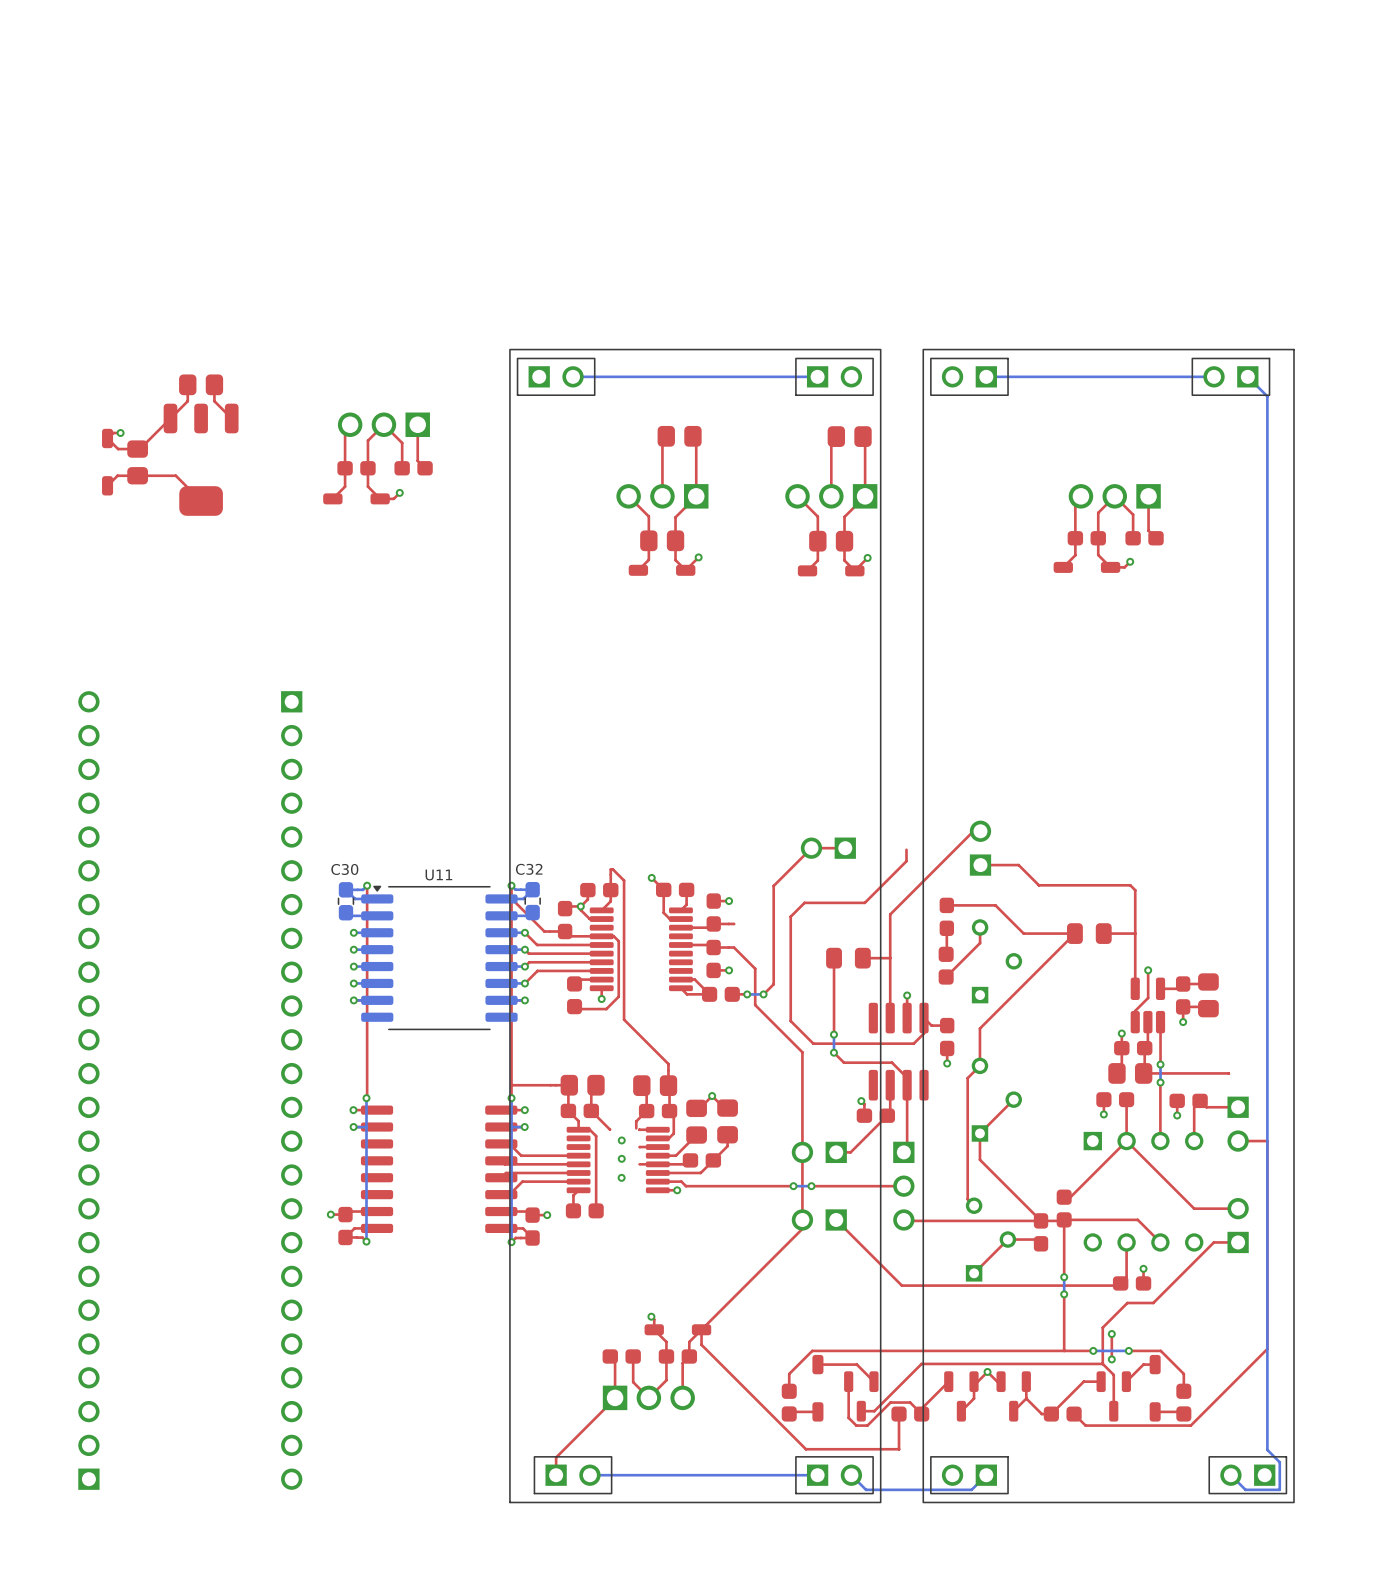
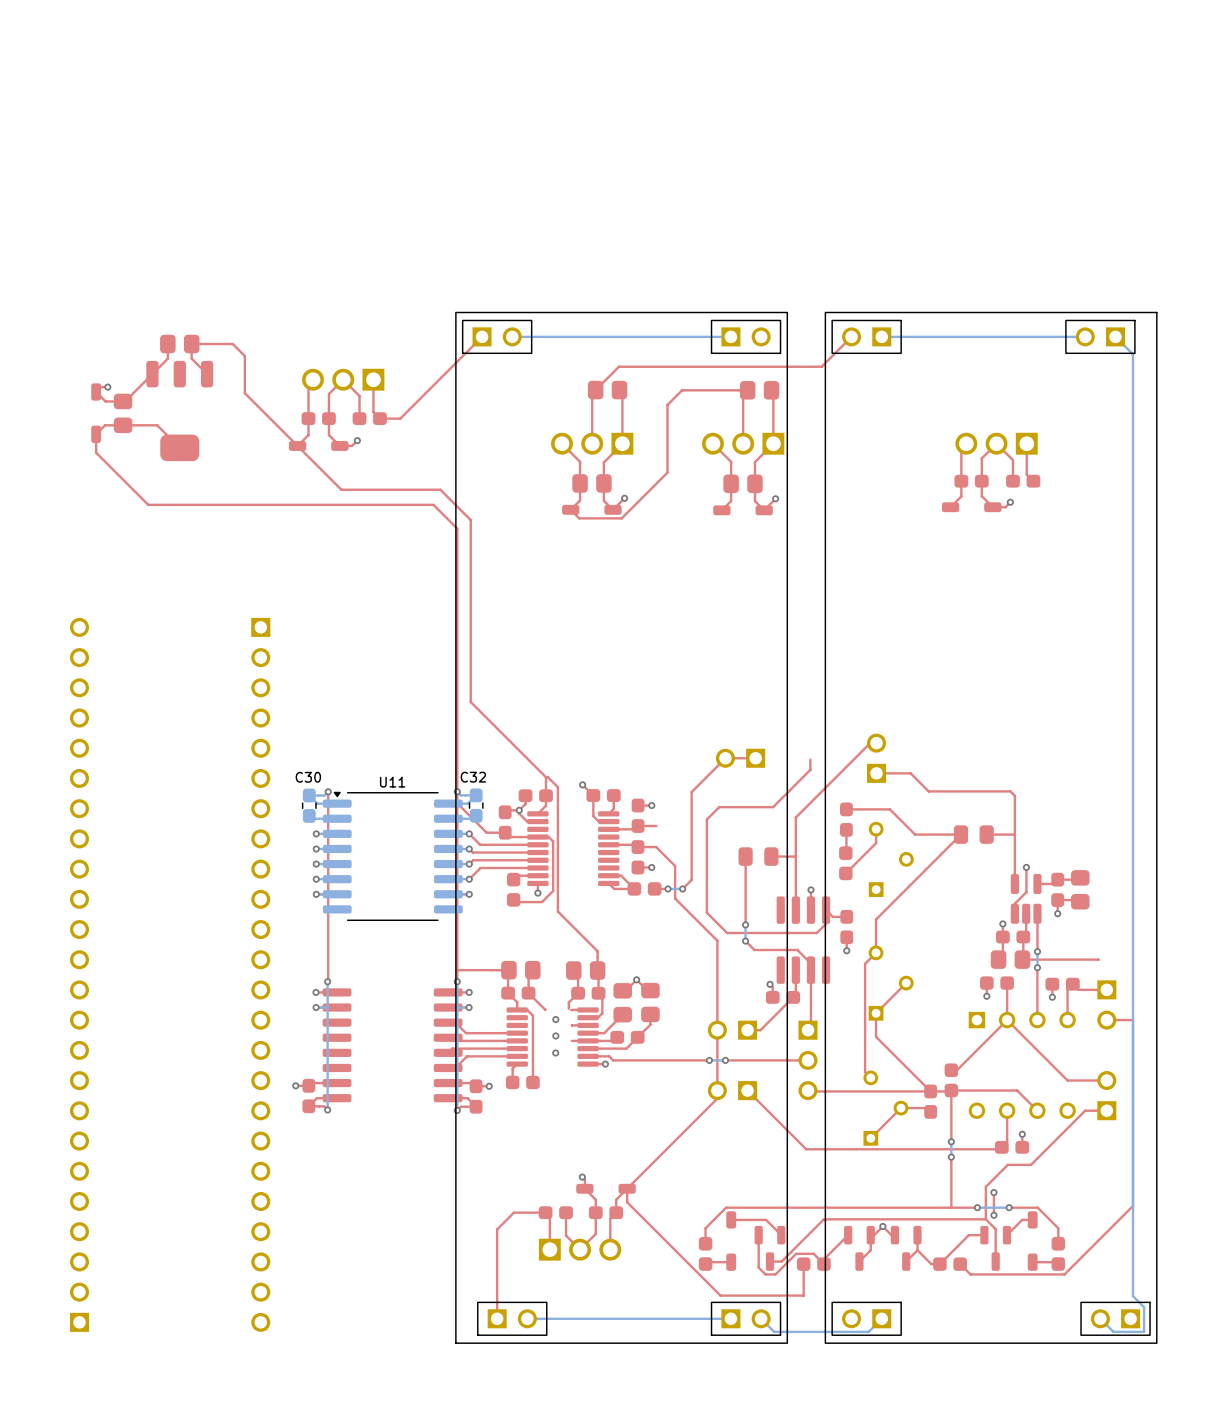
top track: none -> (482, 336) (400, 418) (379, 418)
top track: none -> (851, 336) (821, 366) (618, 366) (595, 390)
top track: none -> (191, 344) (232, 344) (244, 356) (244, 393) (341, 489) (440, 489) (470, 520) (470, 702) (545, 777)
top track: none -> (747, 390) (682, 390) (667, 404) (667, 472) (621, 518) (579, 518) (570, 509)
top track: none -> (96, 434) (96, 452) (148, 504) (433, 504) (457, 528) (457, 791)
top track: (615, 1398) (556, 1457) -> (545, 1212) (513, 1212) (497, 1229) (497, 1302)

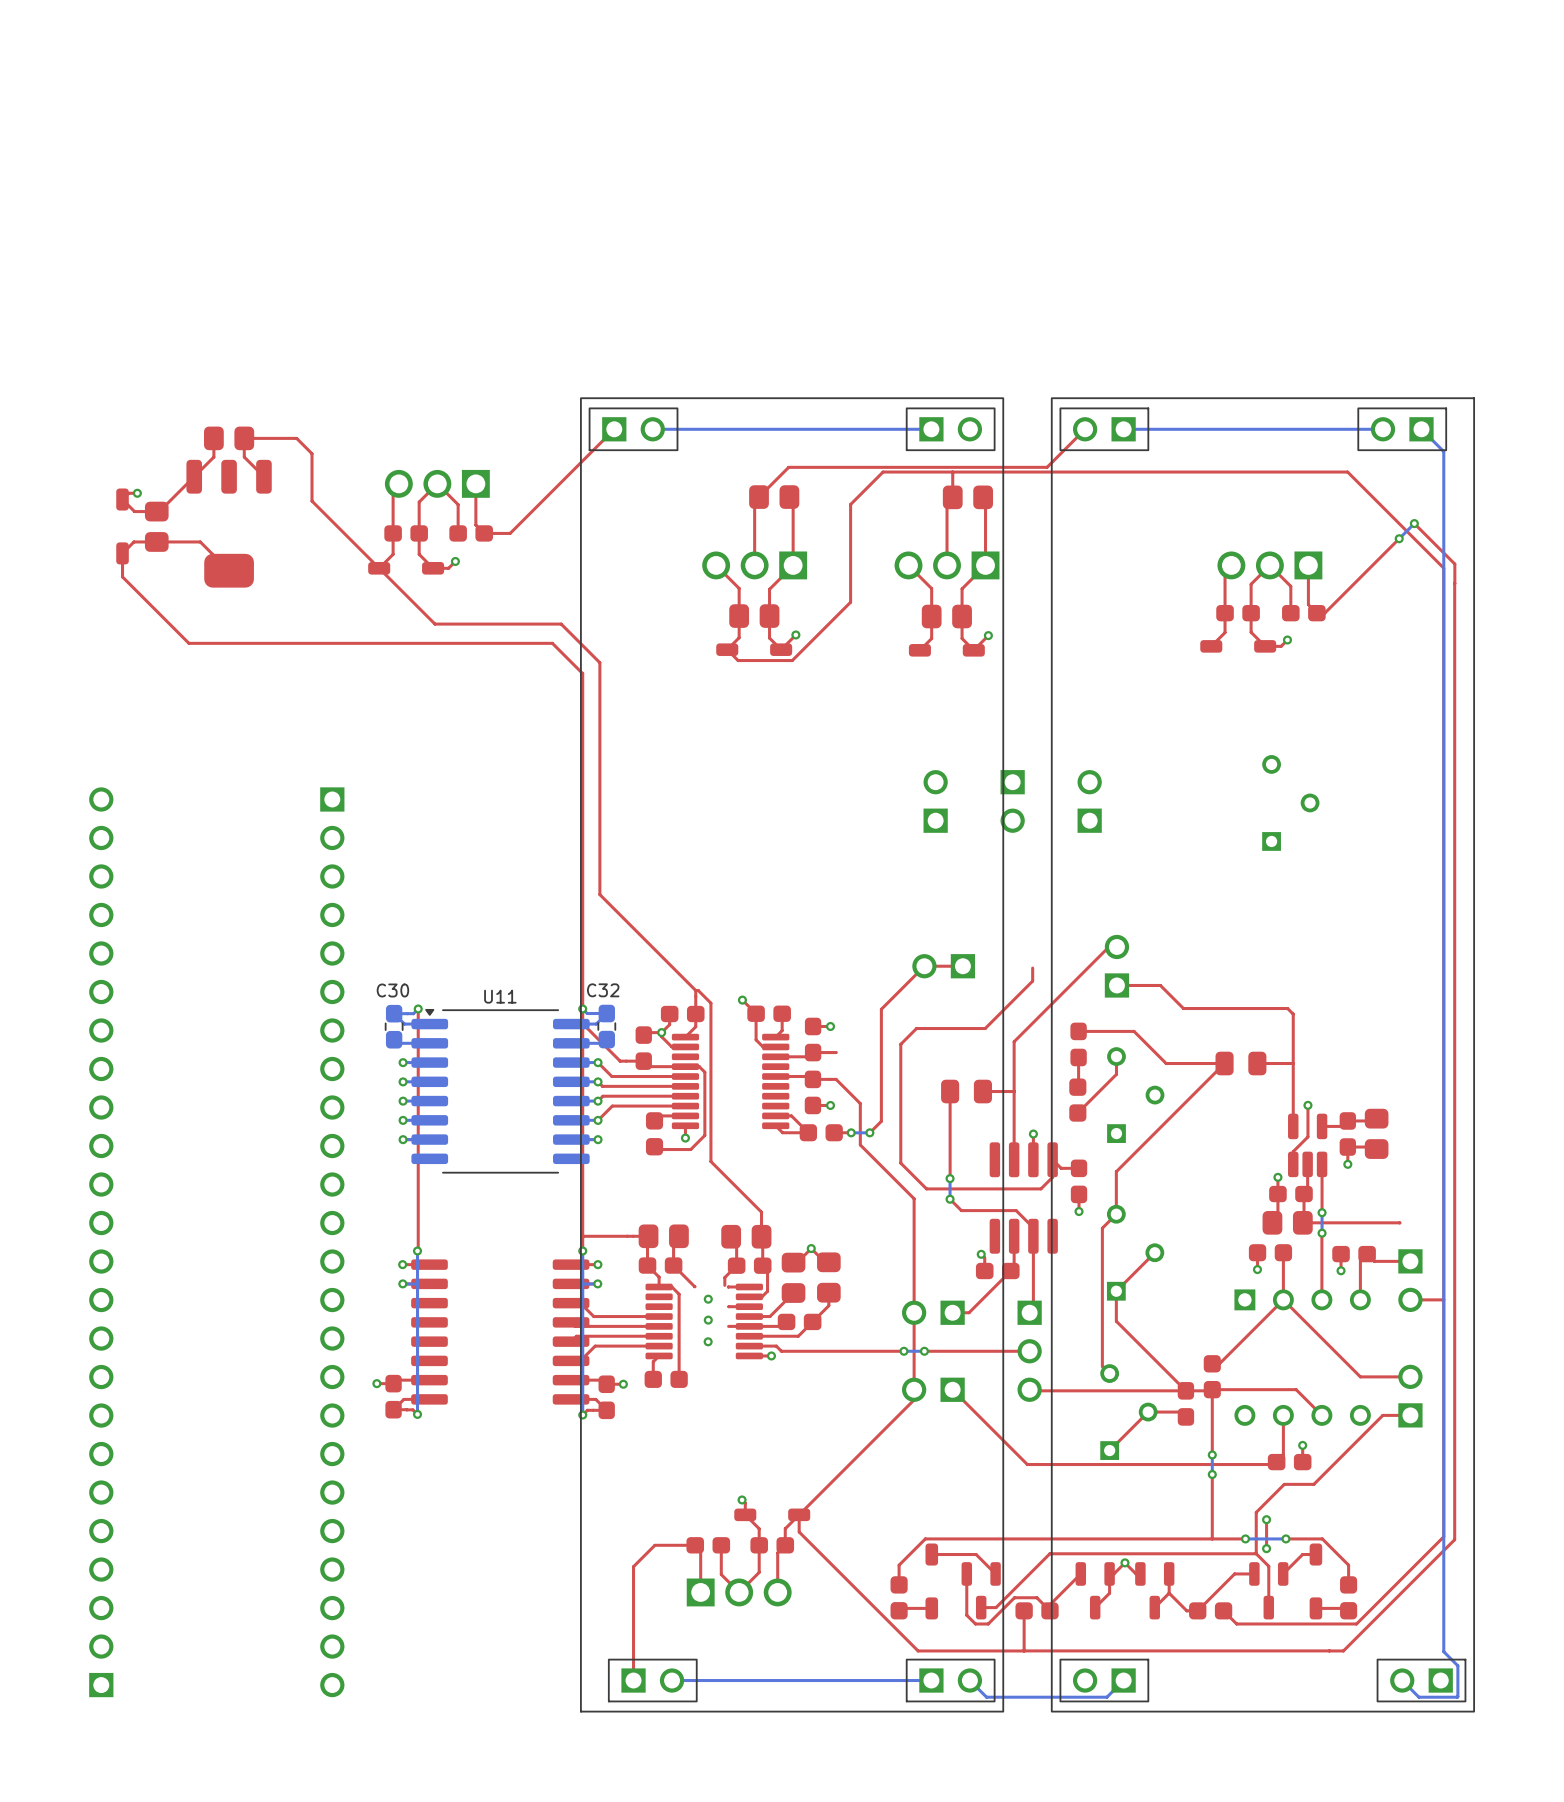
top track: (747, 390) (682, 390) (667, 404) -> (952, 497) (952, 472)
top track: none -> (850, 516) (850, 504) (883, 472) (1347, 472) (1443, 568) (1443, 1299)
bottom track: none -> (1414, 523) (1399, 538)
top track: none -> (1414, 523) (1454, 564) (1454, 583)
via: none -> (1414, 523)
top track: none -> (1399, 538) (1324, 613) (1316, 613)
via: none -> (1399, 538)
top track: none -> (1454, 583) (1454, 1539) (1343, 1650) (1024, 1650)
part: none -> (935, 801)
part: none -> (1012, 801)
part: none -> (1089, 801)
part: none -> (1290, 802)

